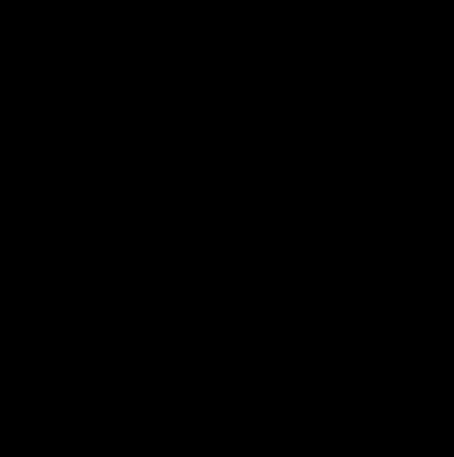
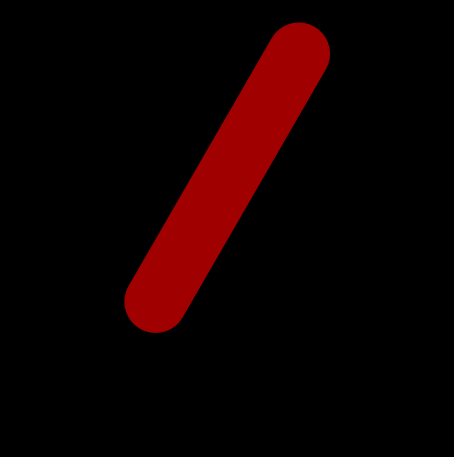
track: none -> (298, 53) (155, 301)

